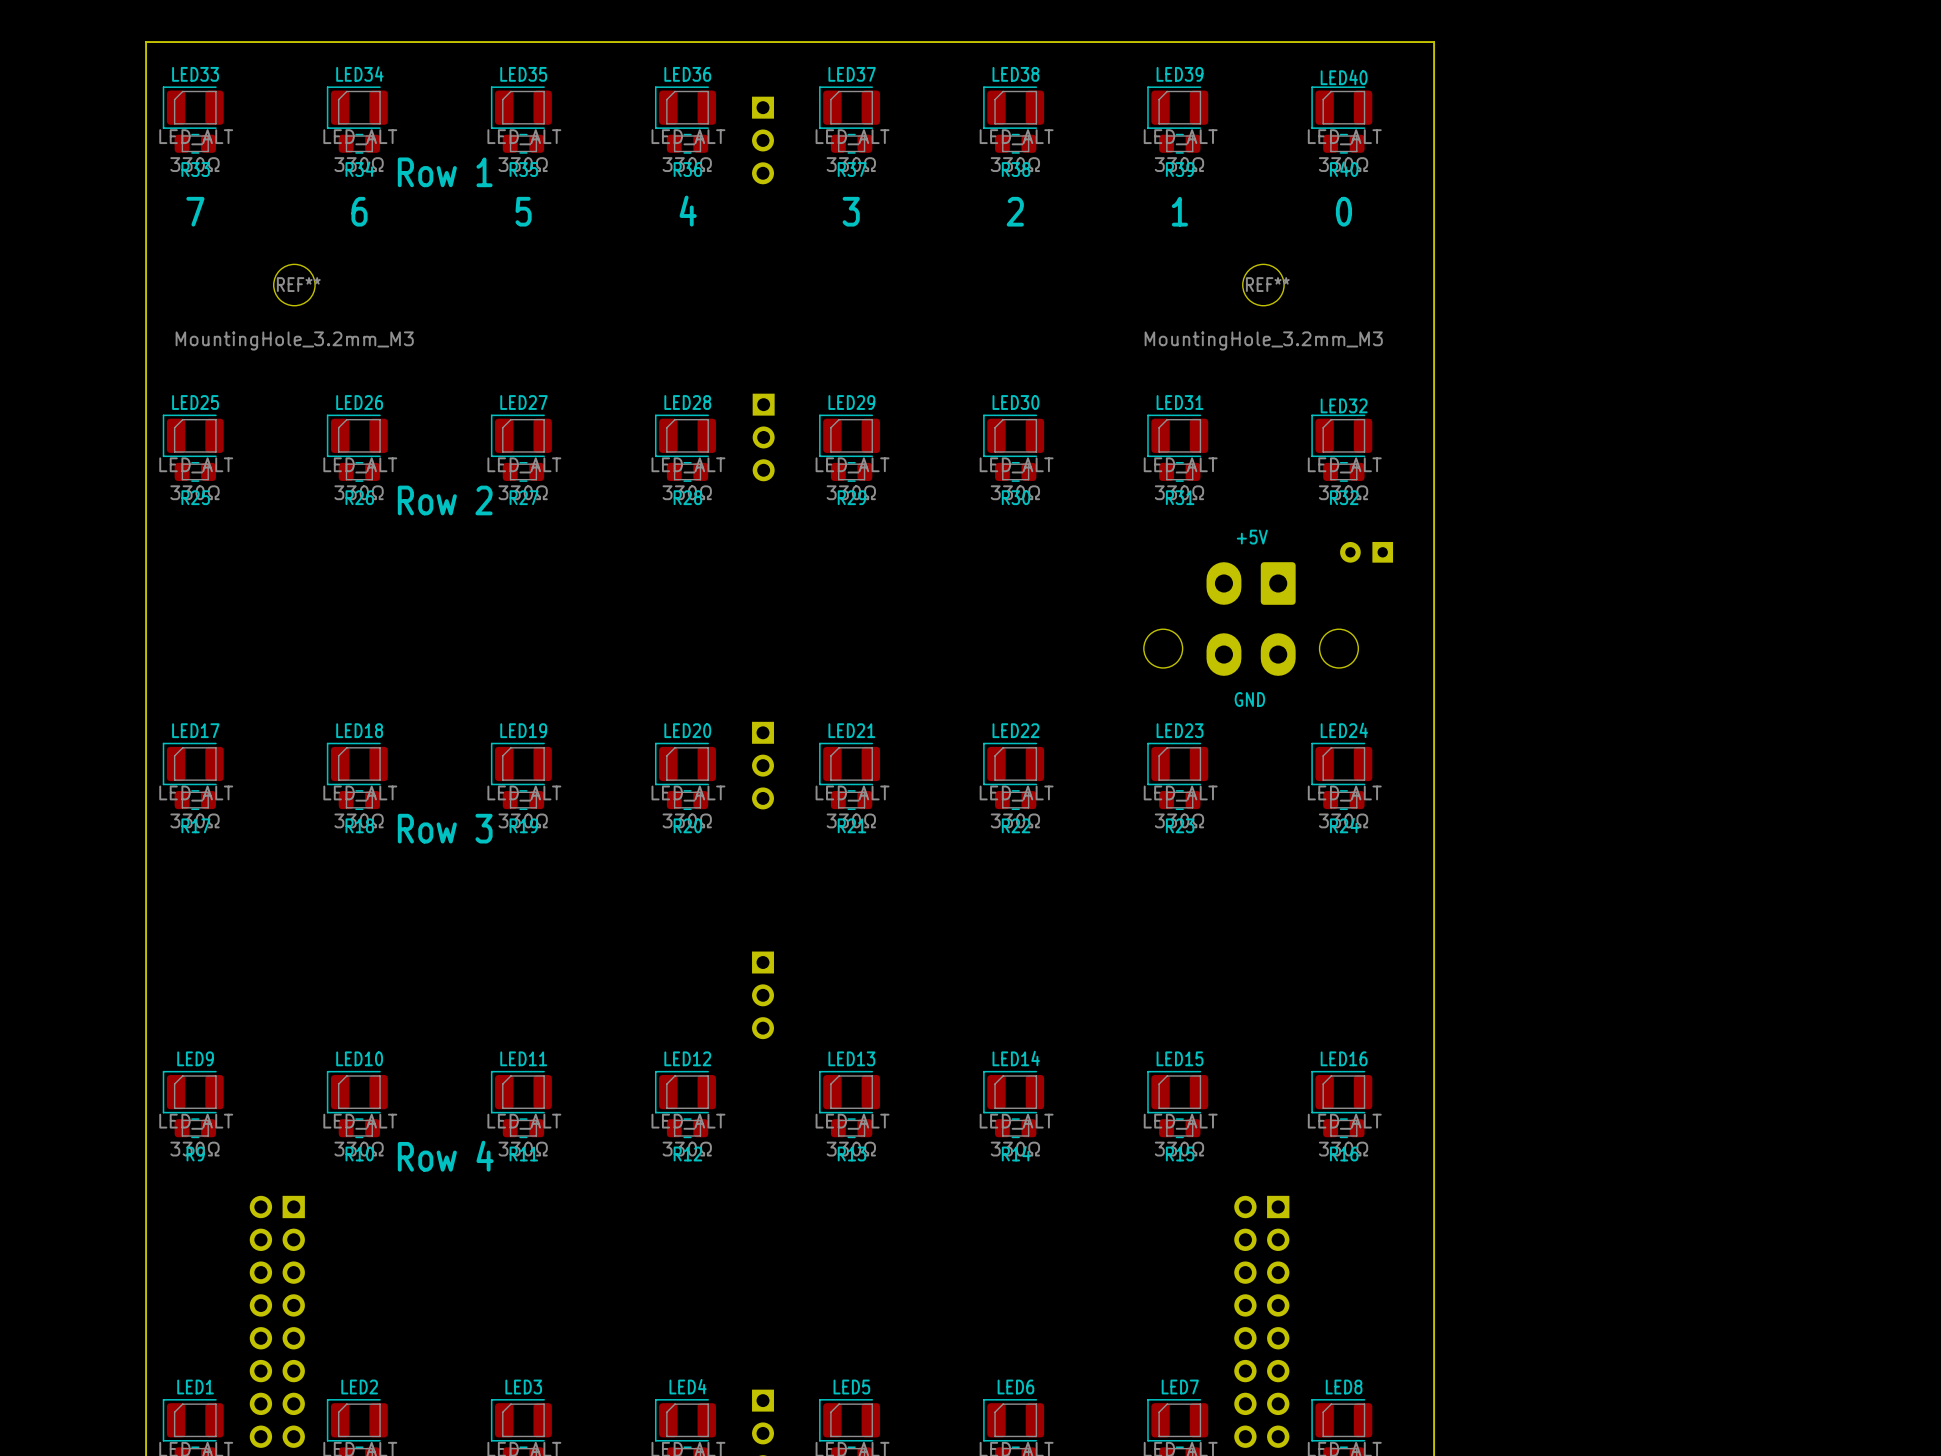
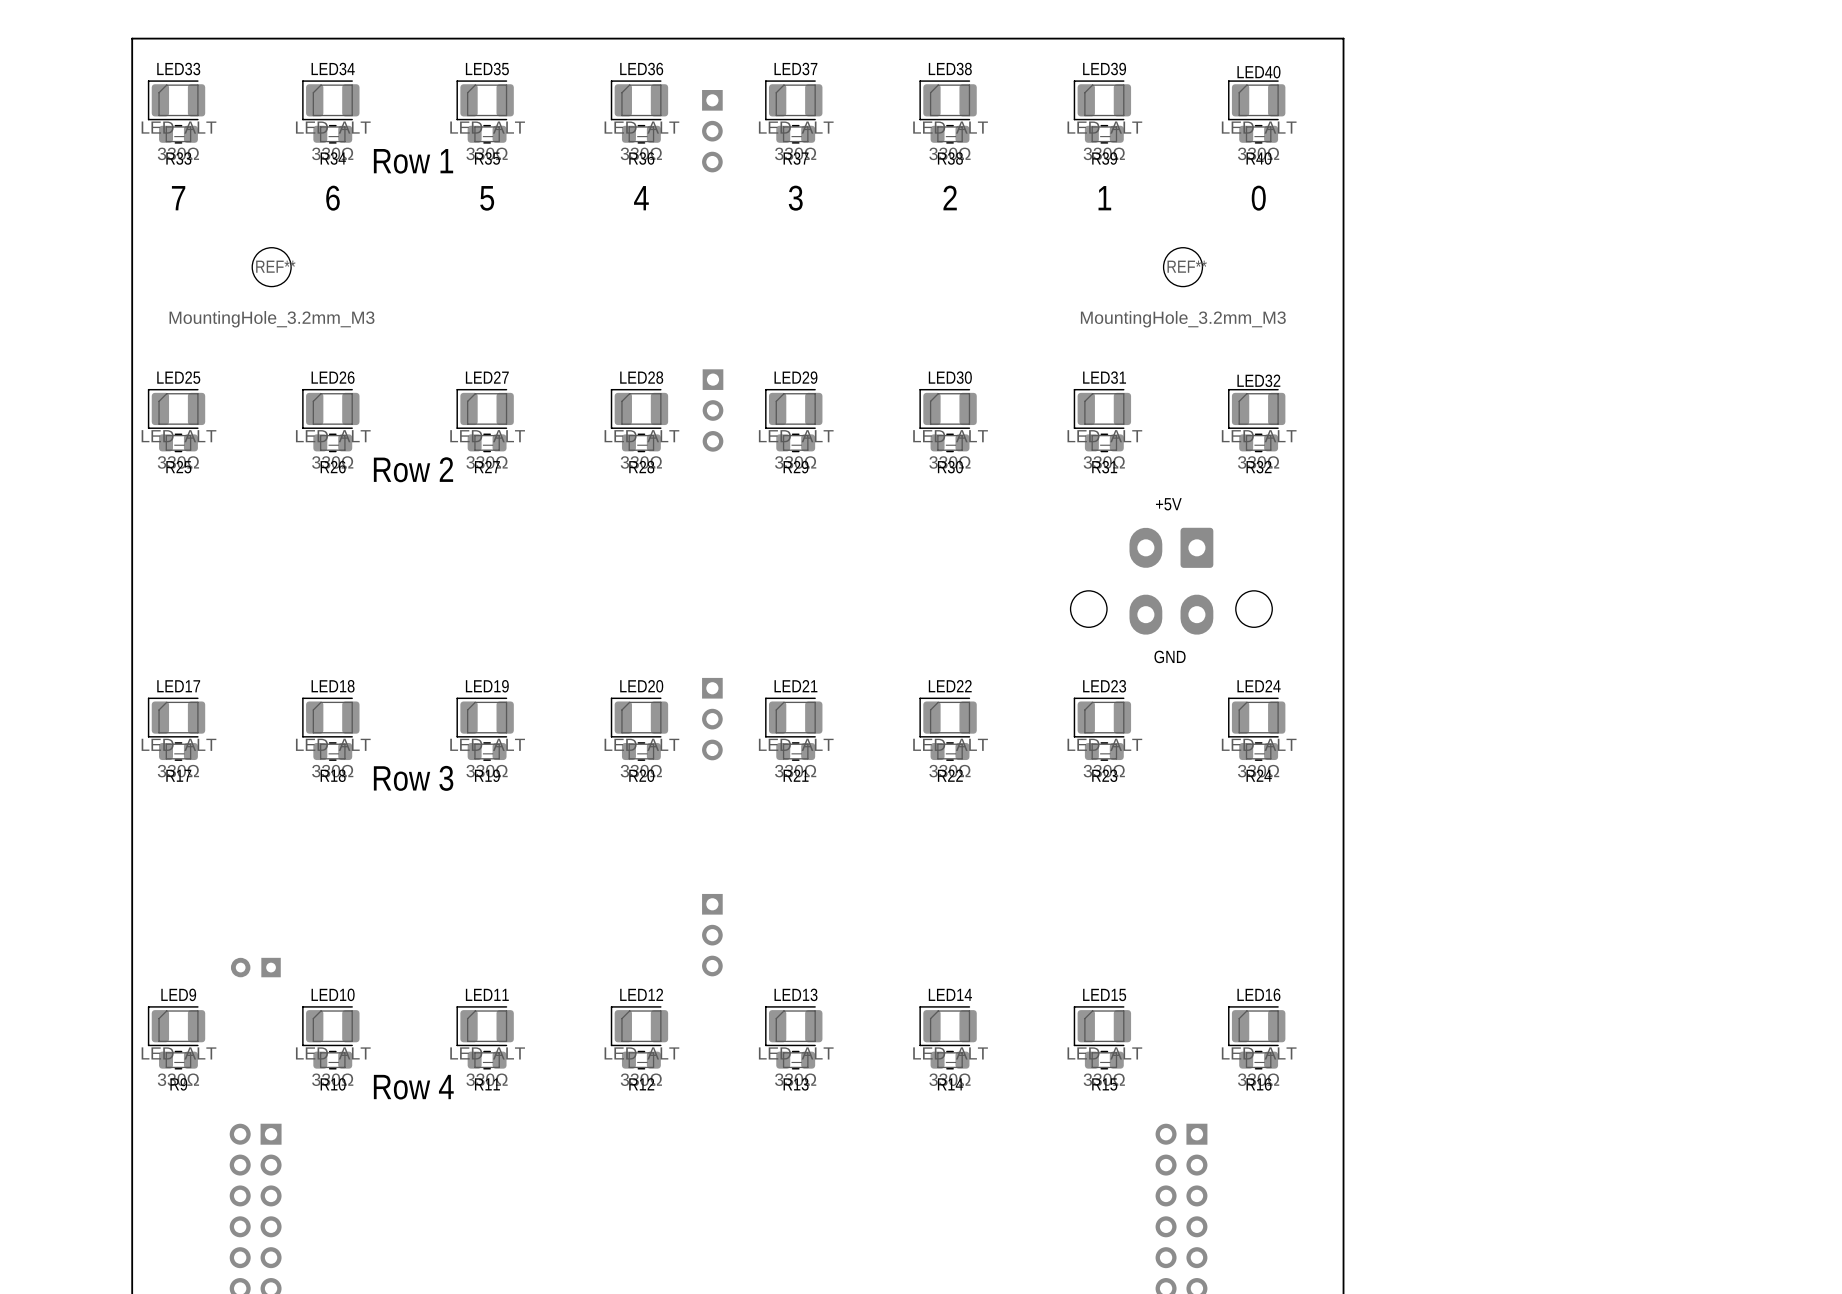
part: (1366, 552) -> none
part: none -> (255, 967)

